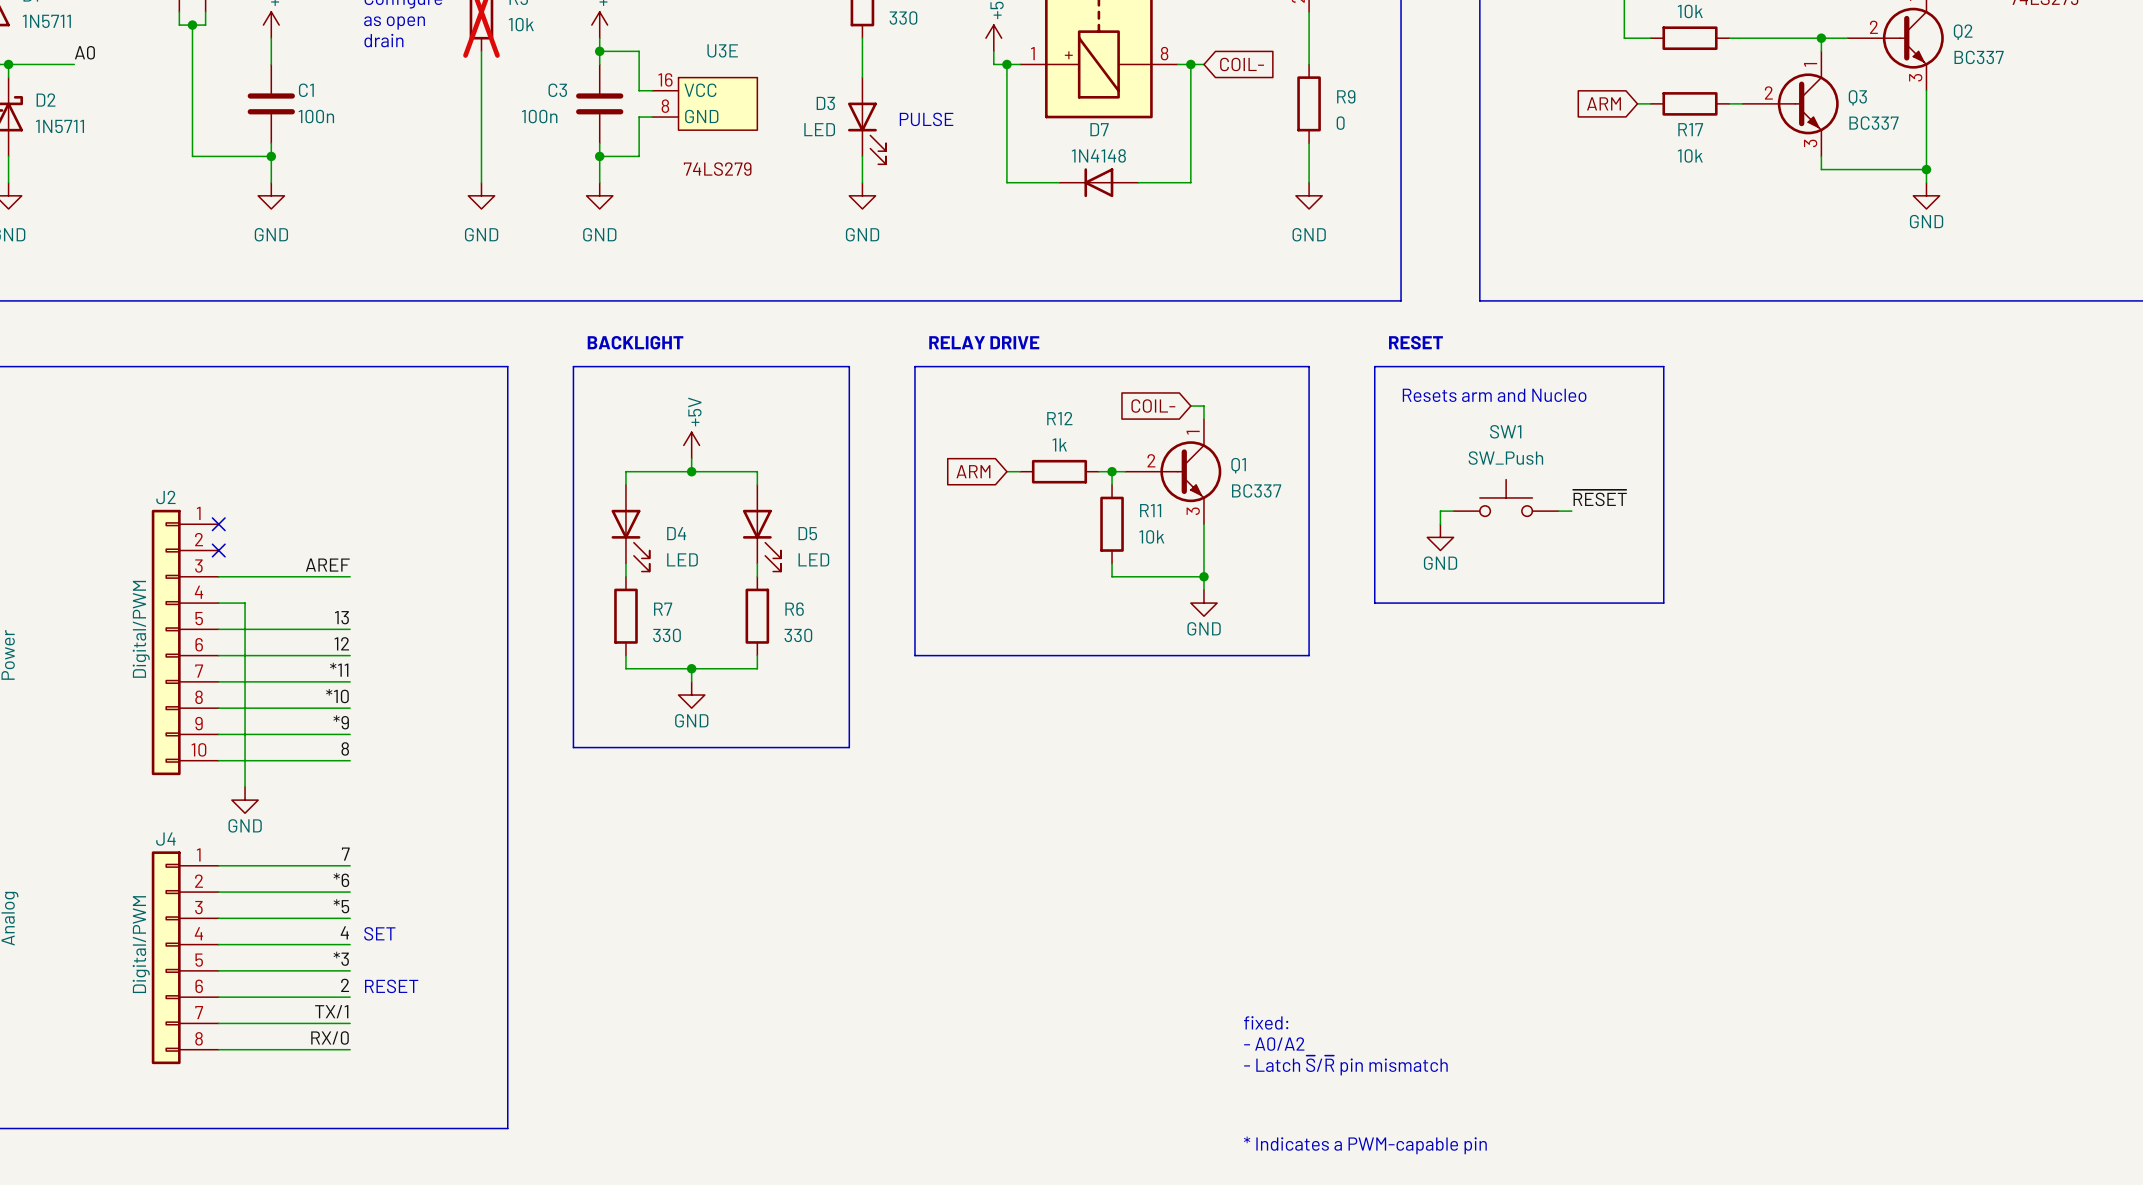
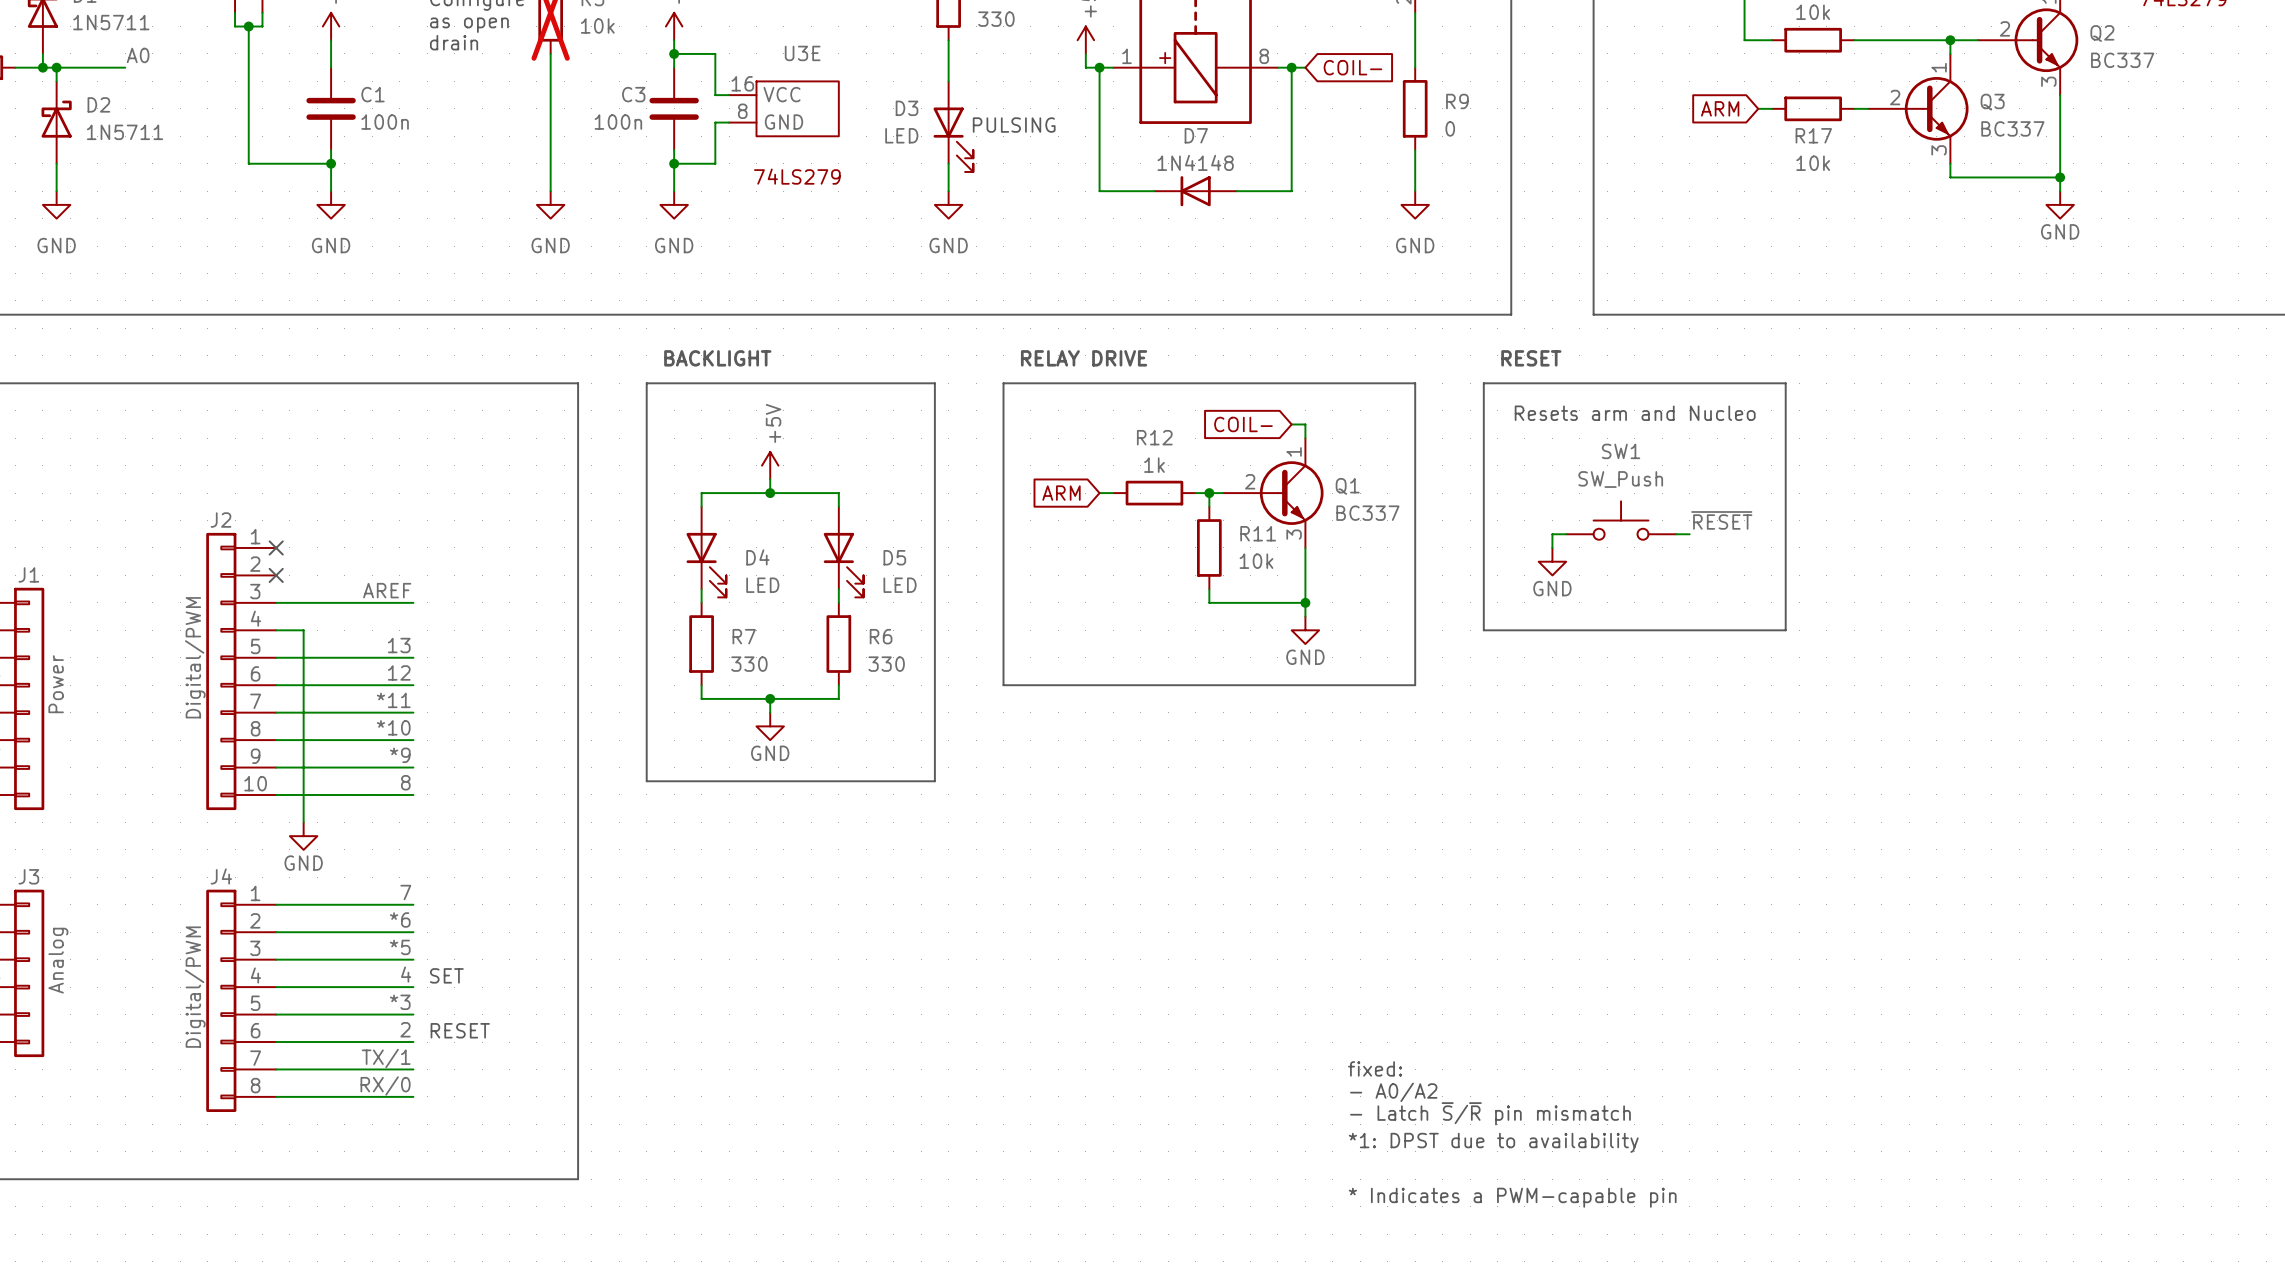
text: PULSE (926, 119) -> PULSING (1014, 125)
text: none -> *1: DPST due to availability (1493, 1142)

